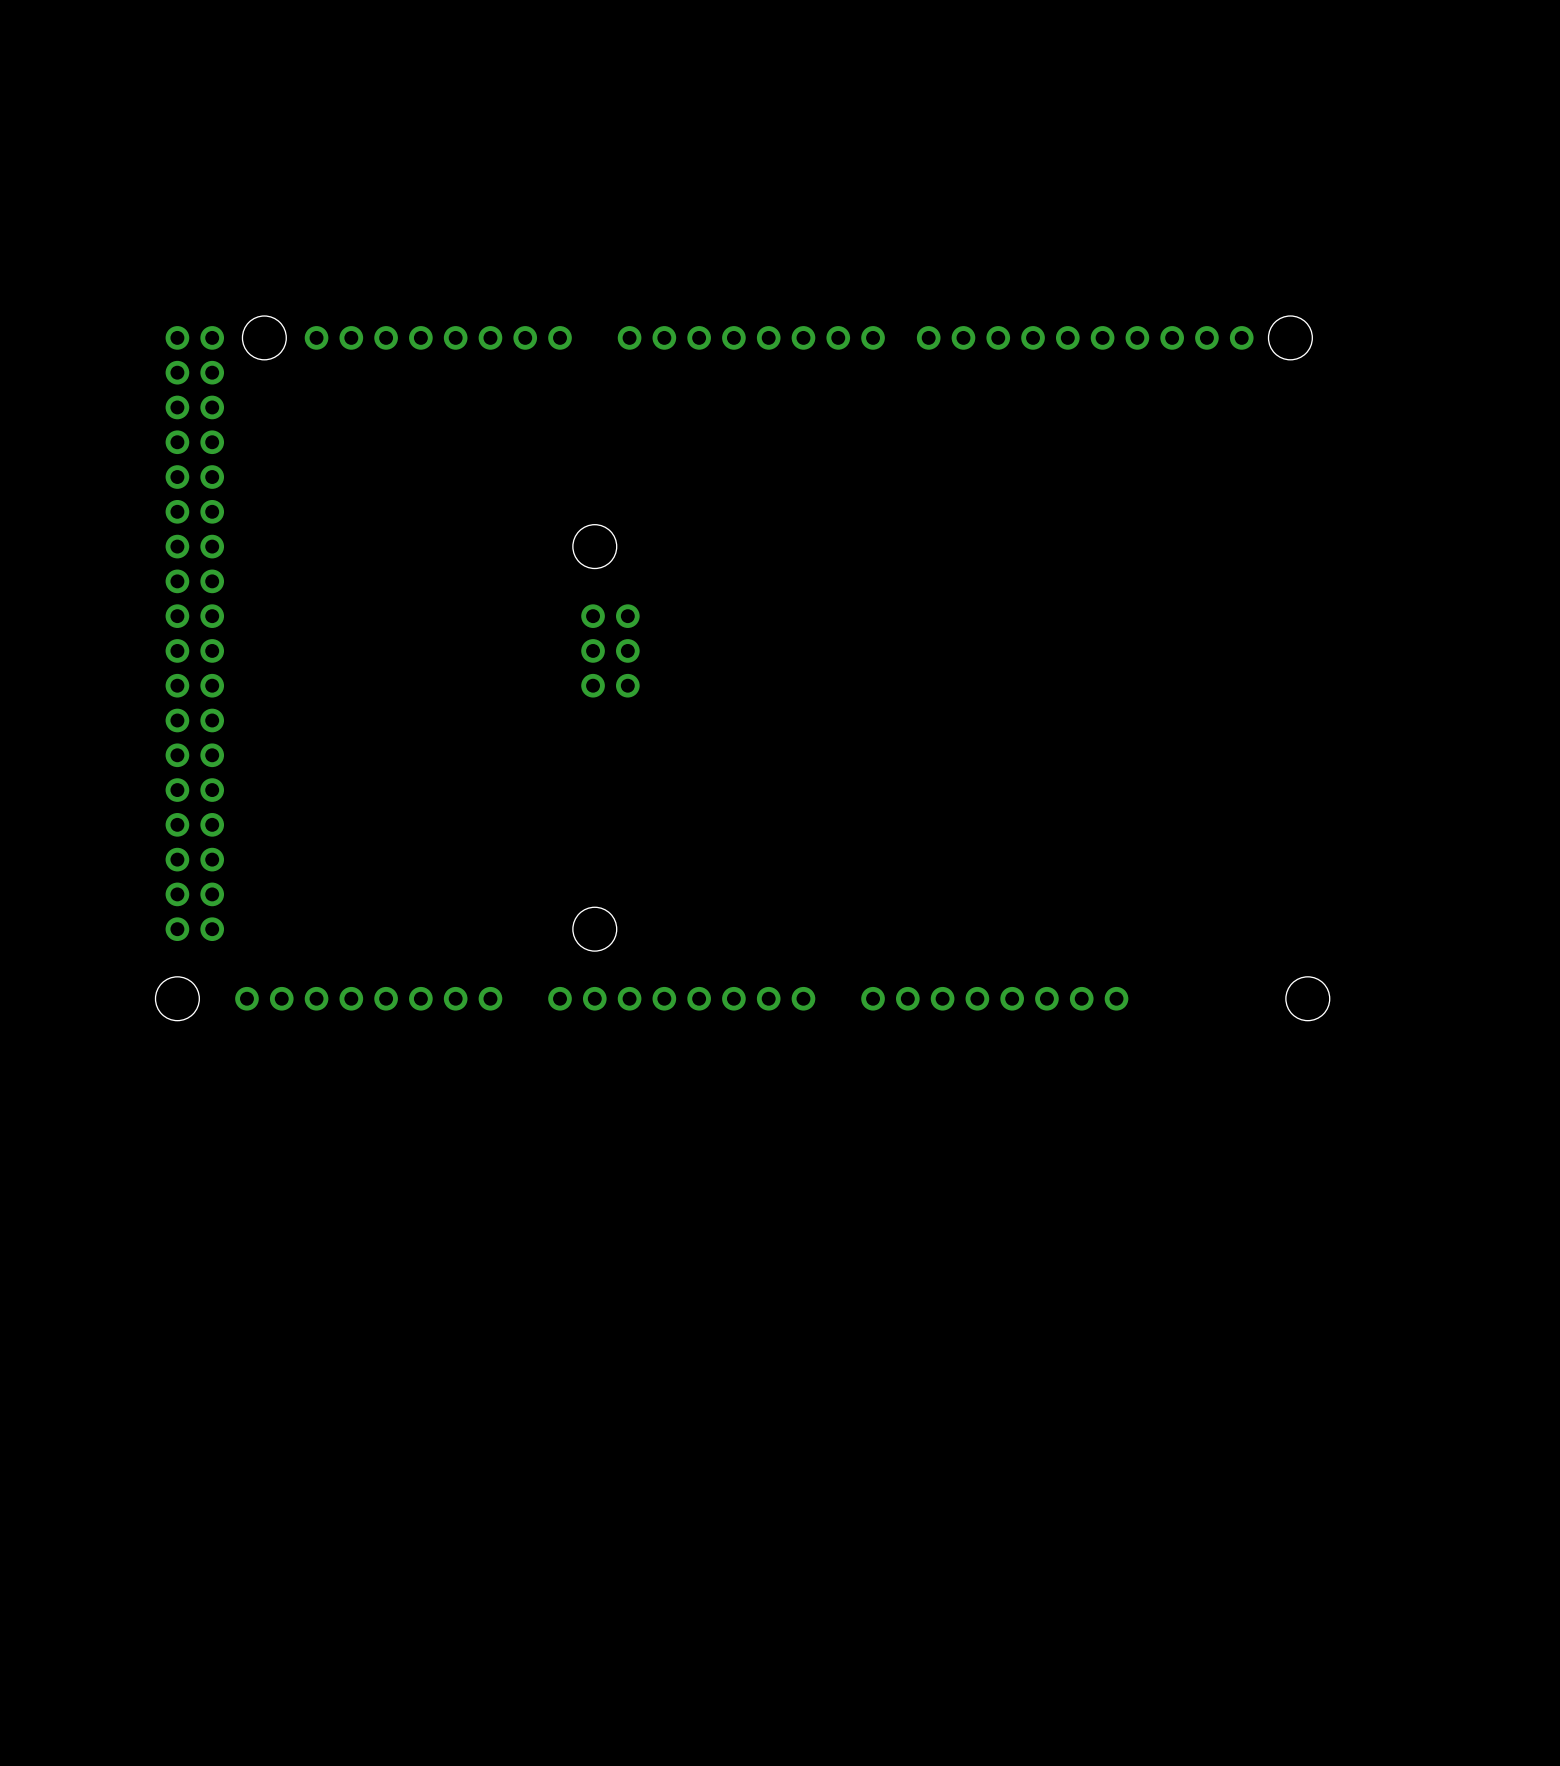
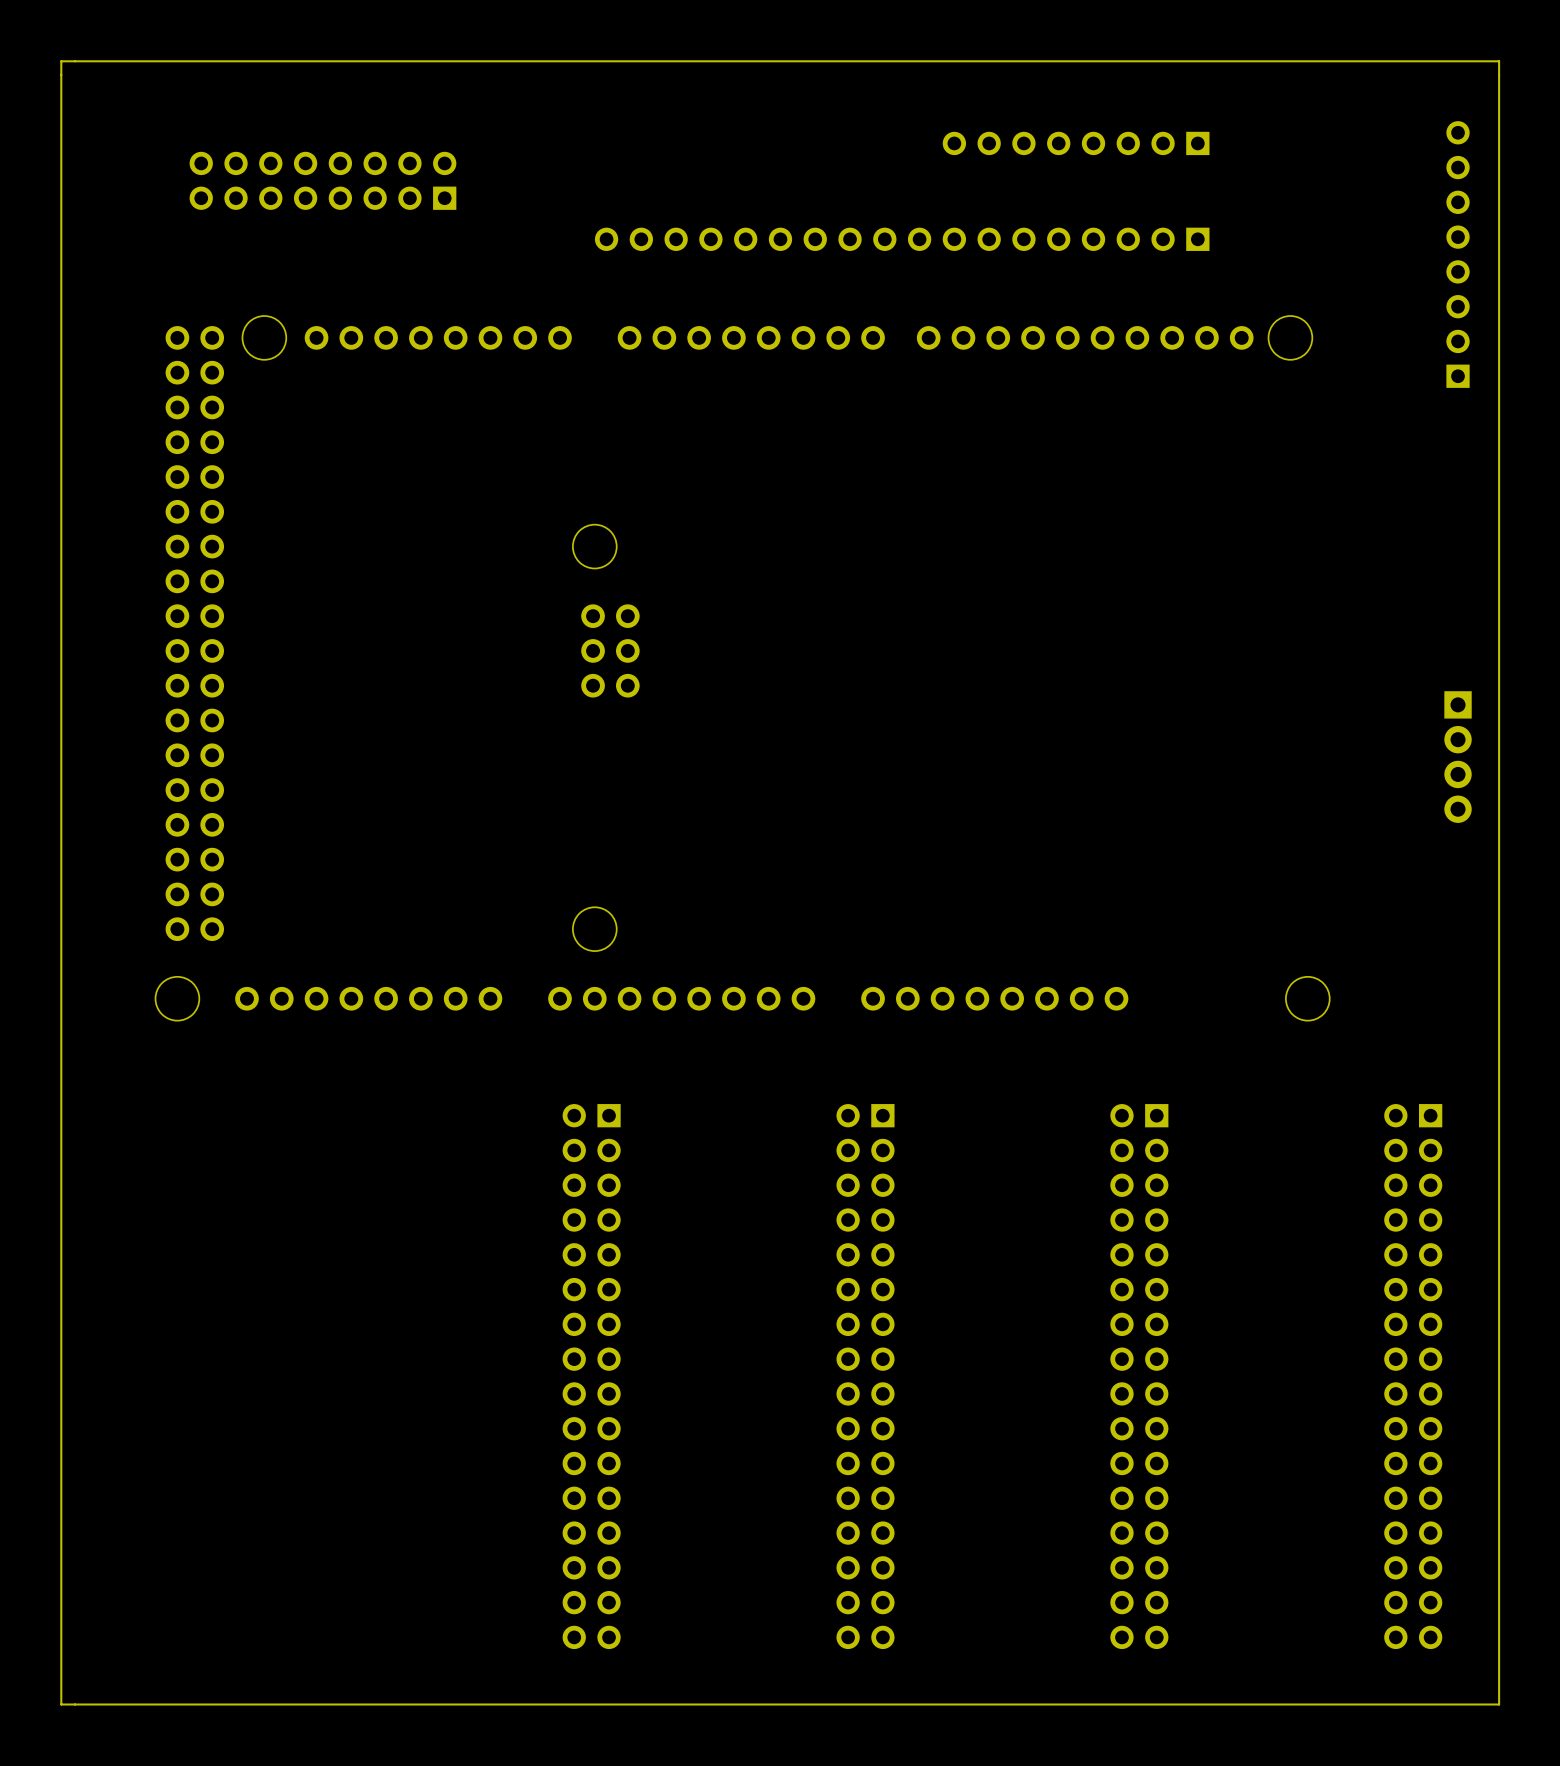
board edge: none -> (1499, 61) (1499, 1704) (61, 1704) (61, 61) (1499, 61)
part: none -> (1076, 143)
part: none -> (322, 180)
part: none -> (902, 239)
part: none -> (1458, 254)
part: none -> (1458, 757)
part: none -> (591, 1376)
part: none -> (865, 1376)
part: none -> (1139, 1376)
part: none -> (1413, 1376)

